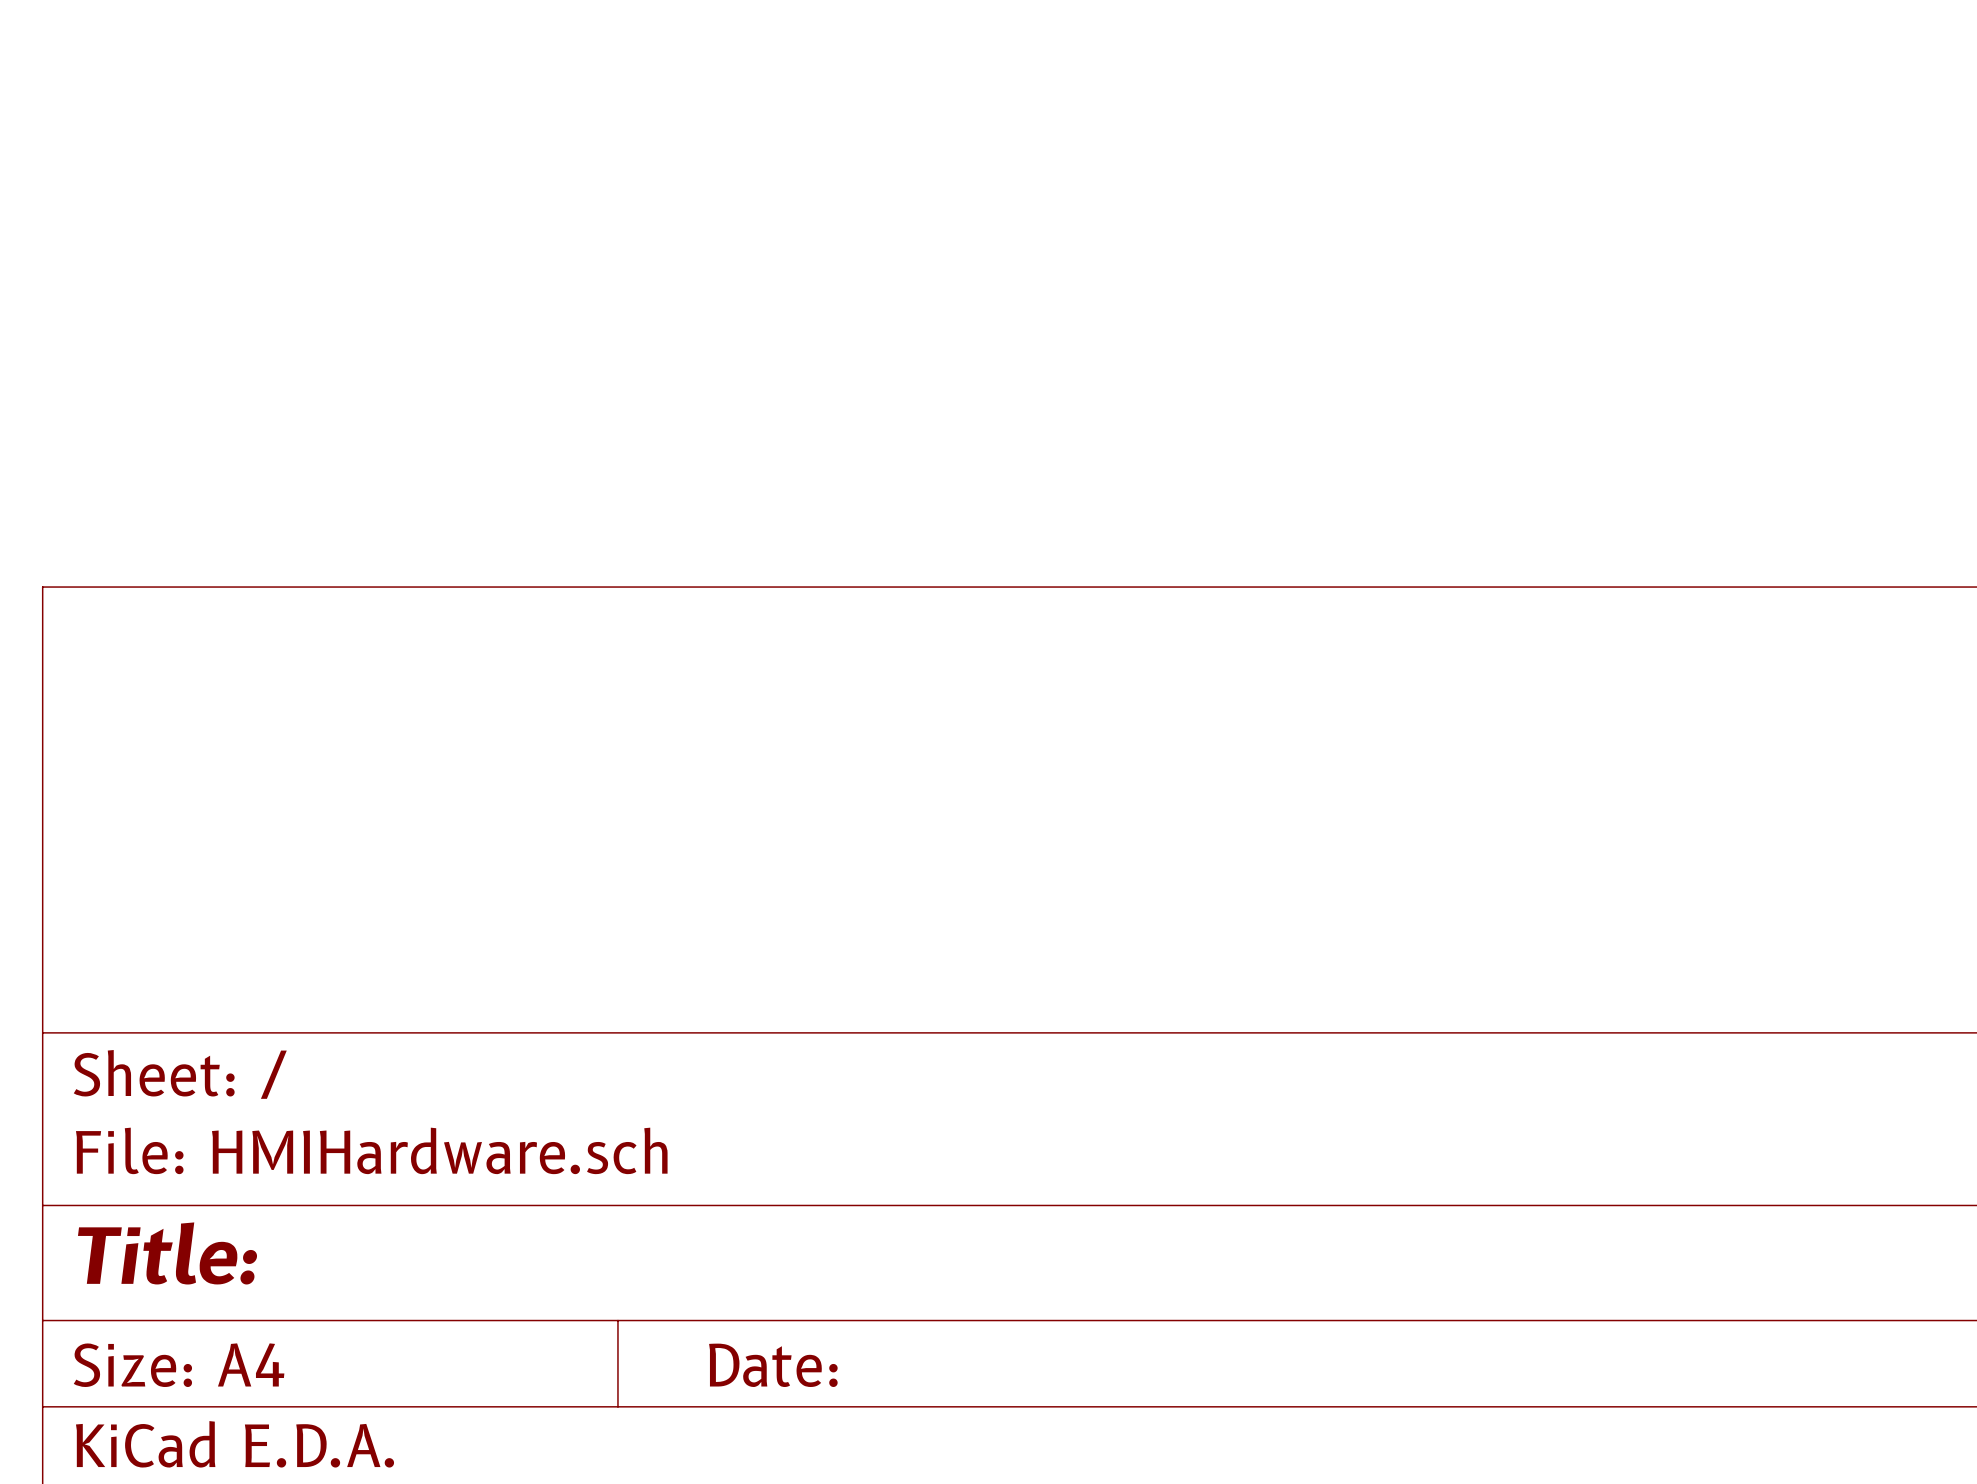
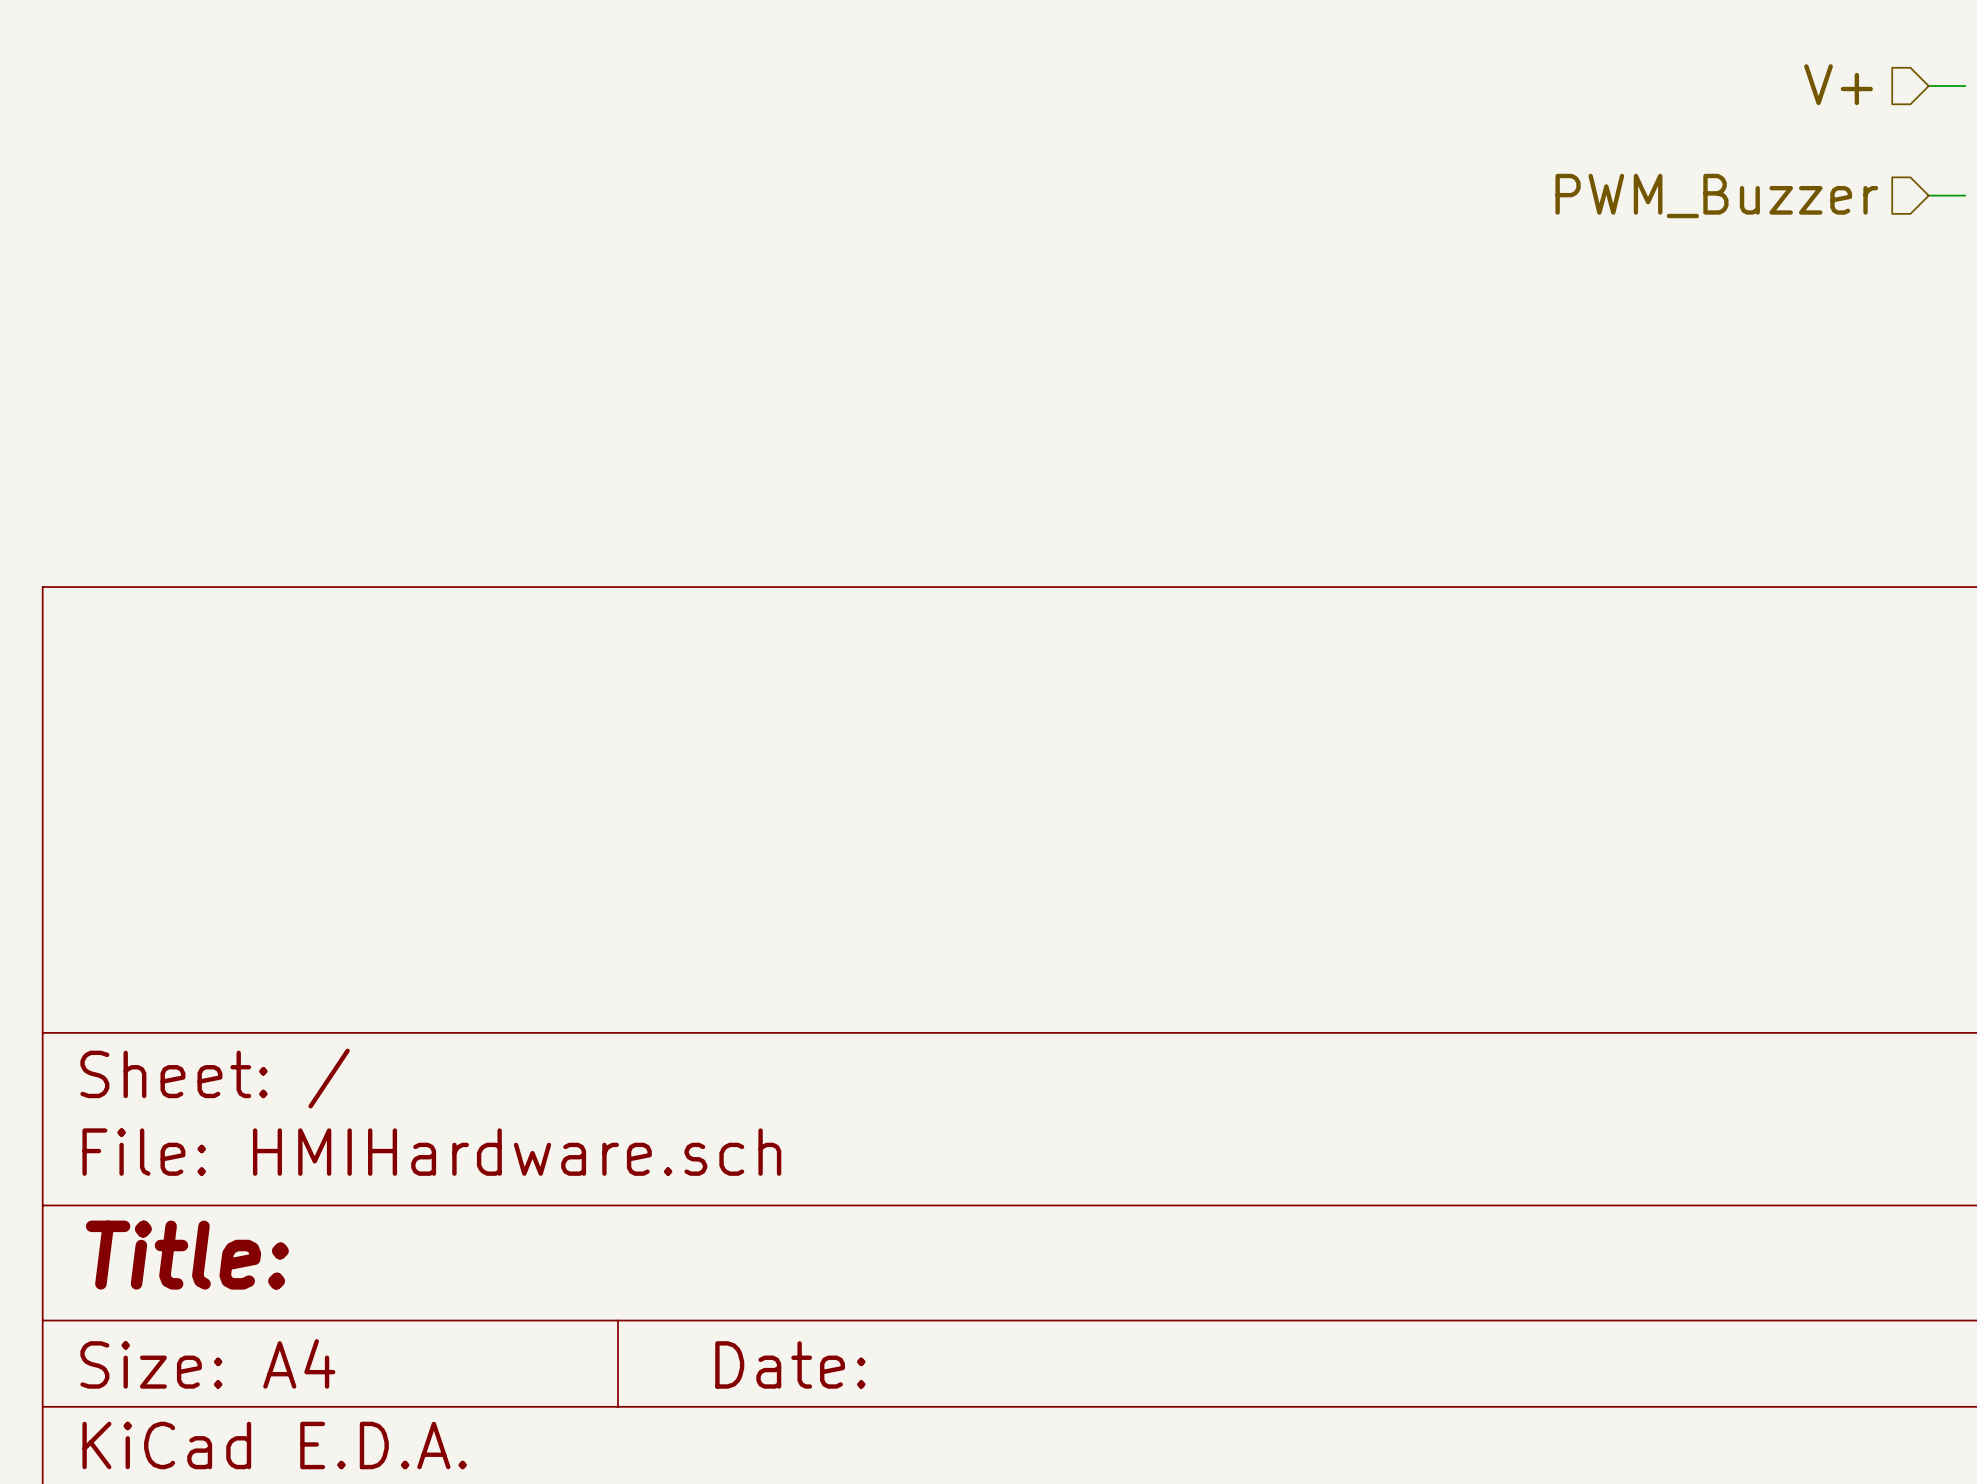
hierarchical label: none -> V+ (1838, 84)
wire: none -> (1928, 86) (1965, 86)
wire: none -> (1928, 195) (1965, 195)
hierarchical label: none -> PWM_Buzzer (1716, 195)

